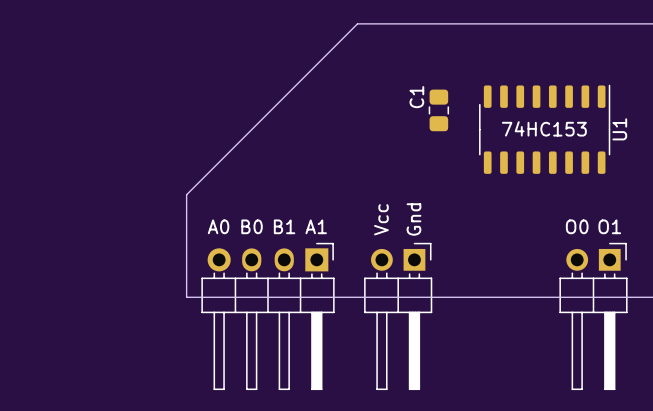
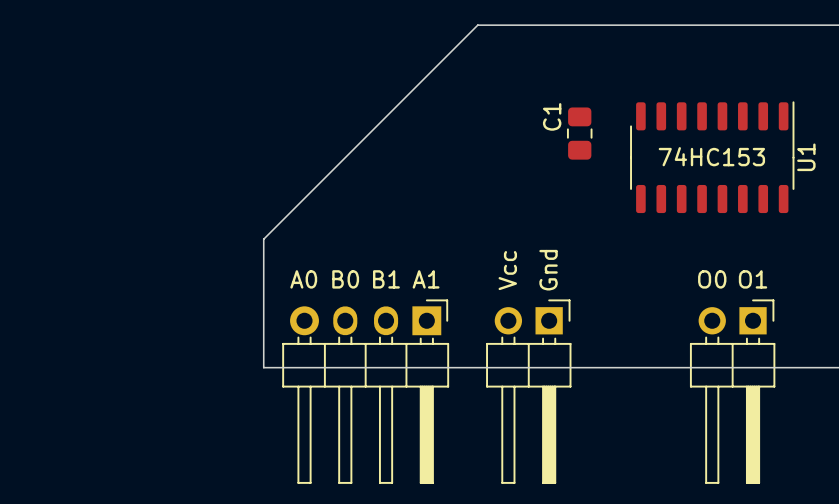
text: none -> O0 (712, 279)
text: O0 (577, 226) -> O1 (753, 279)
text: O1 (609, 226) -> none
part position: (593, 316) -> (732, 391)

